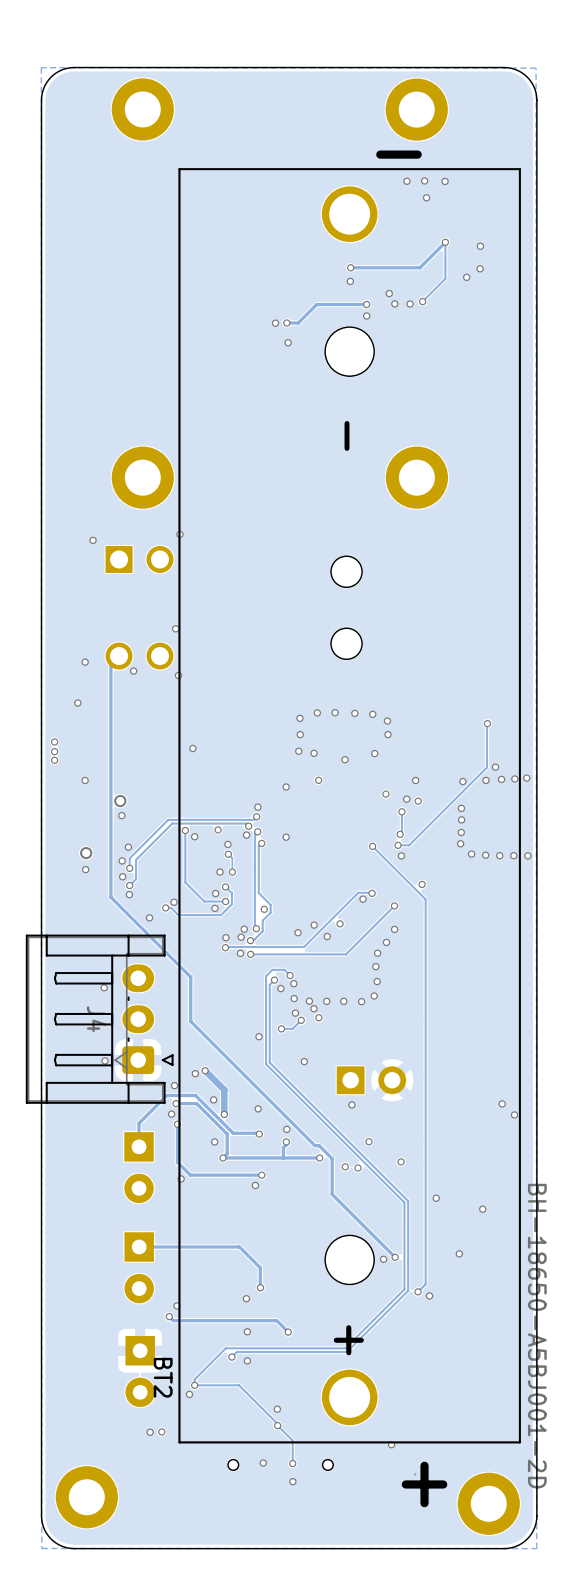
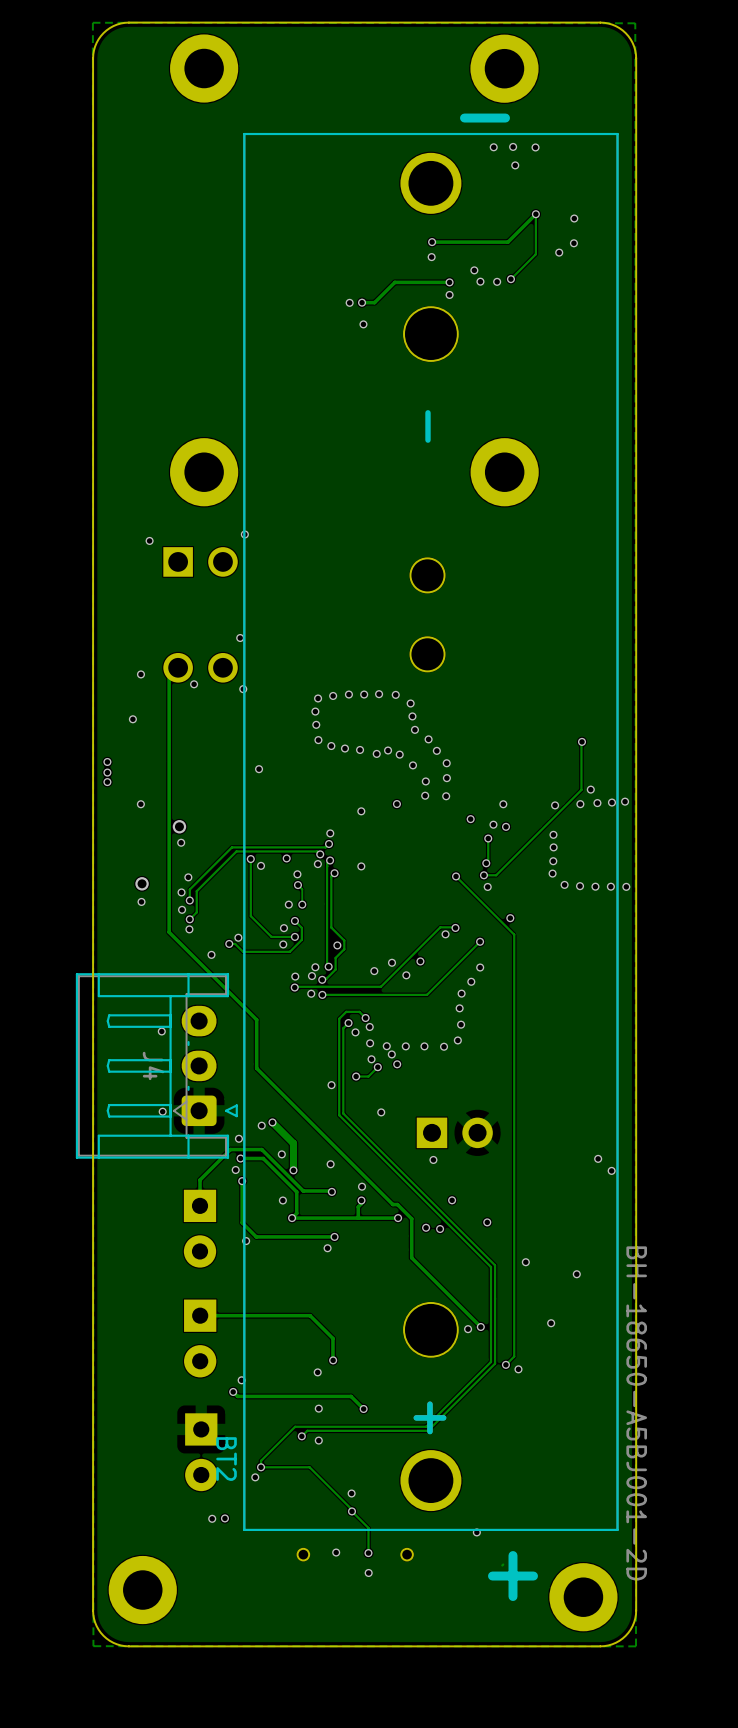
via: none -> (348, 694)
via: none -> (364, 694)
via: none -> (379, 694)
via: none -> (395, 694)
via: none -> (333, 695)
via: none -> (318, 698)
via: none -> (410, 703)
via: none -> (315, 711)
via: none -> (412, 716)
via: none -> (316, 724)
via: (317, 712) -> none
via: (354, 713) -> none
via: (372, 714) -> none
via: (299, 718) -> none
via: none -> (428, 739)
via: (387, 721) -> none
via: none -> (318, 740)
via: none -> (331, 746)
via: none -> (344, 748)
via: none -> (360, 749)
via: none -> (388, 750)
via: none -> (436, 750)
via: (387, 734) -> none
via: none -> (399, 754)
via: none -> (446, 763)
via: none -> (412, 765)
via: (298, 751) -> none
via: (314, 753) -> none
via: (374, 753) -> none
via: none -> (446, 778)
via: none -> (425, 795)
via: none -> (446, 796)

